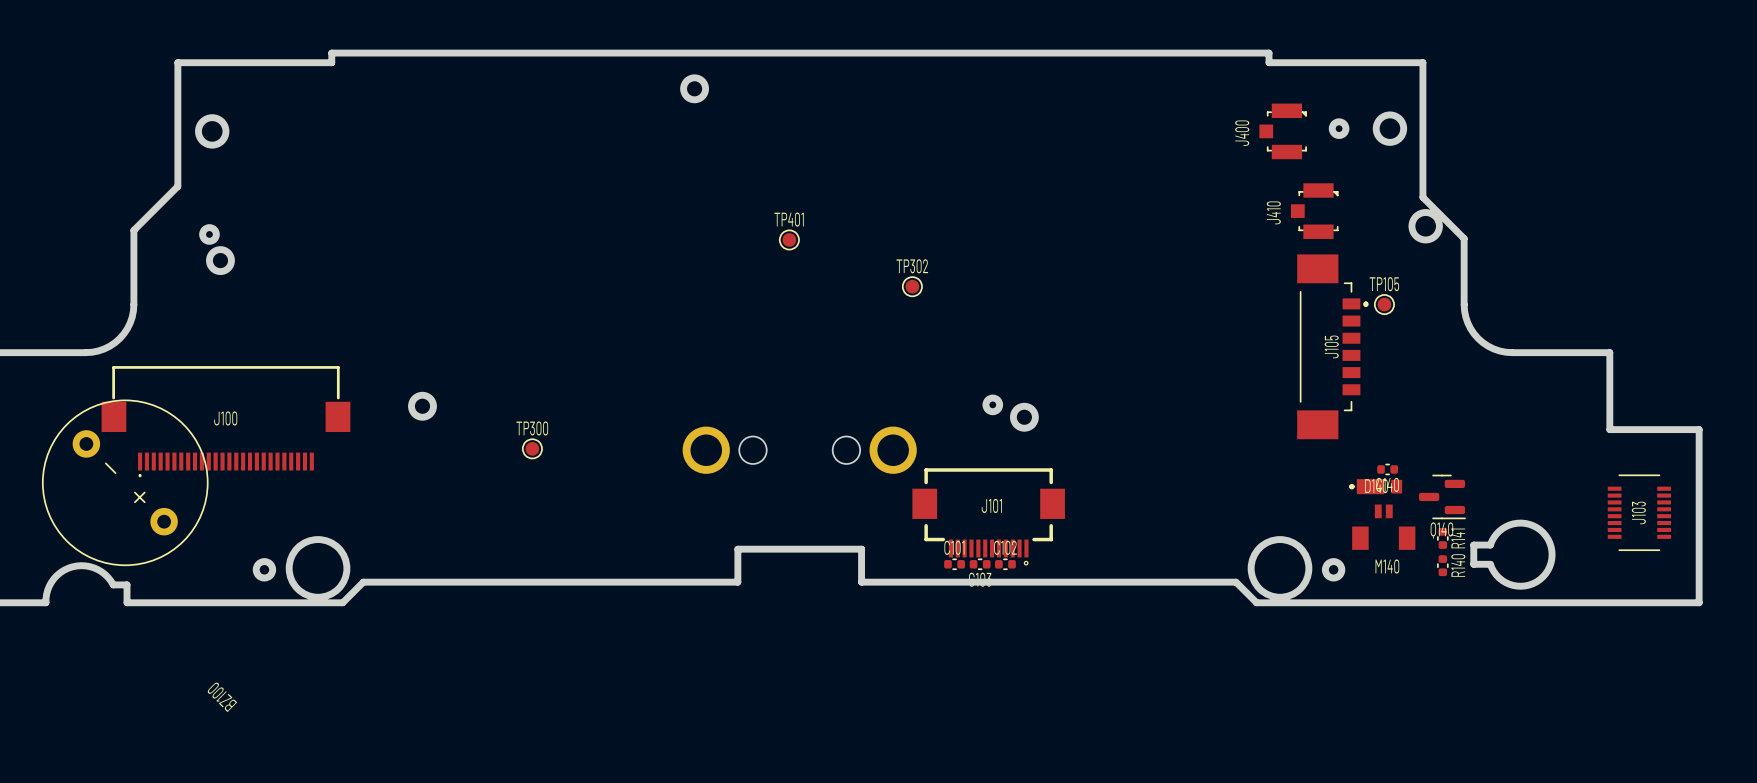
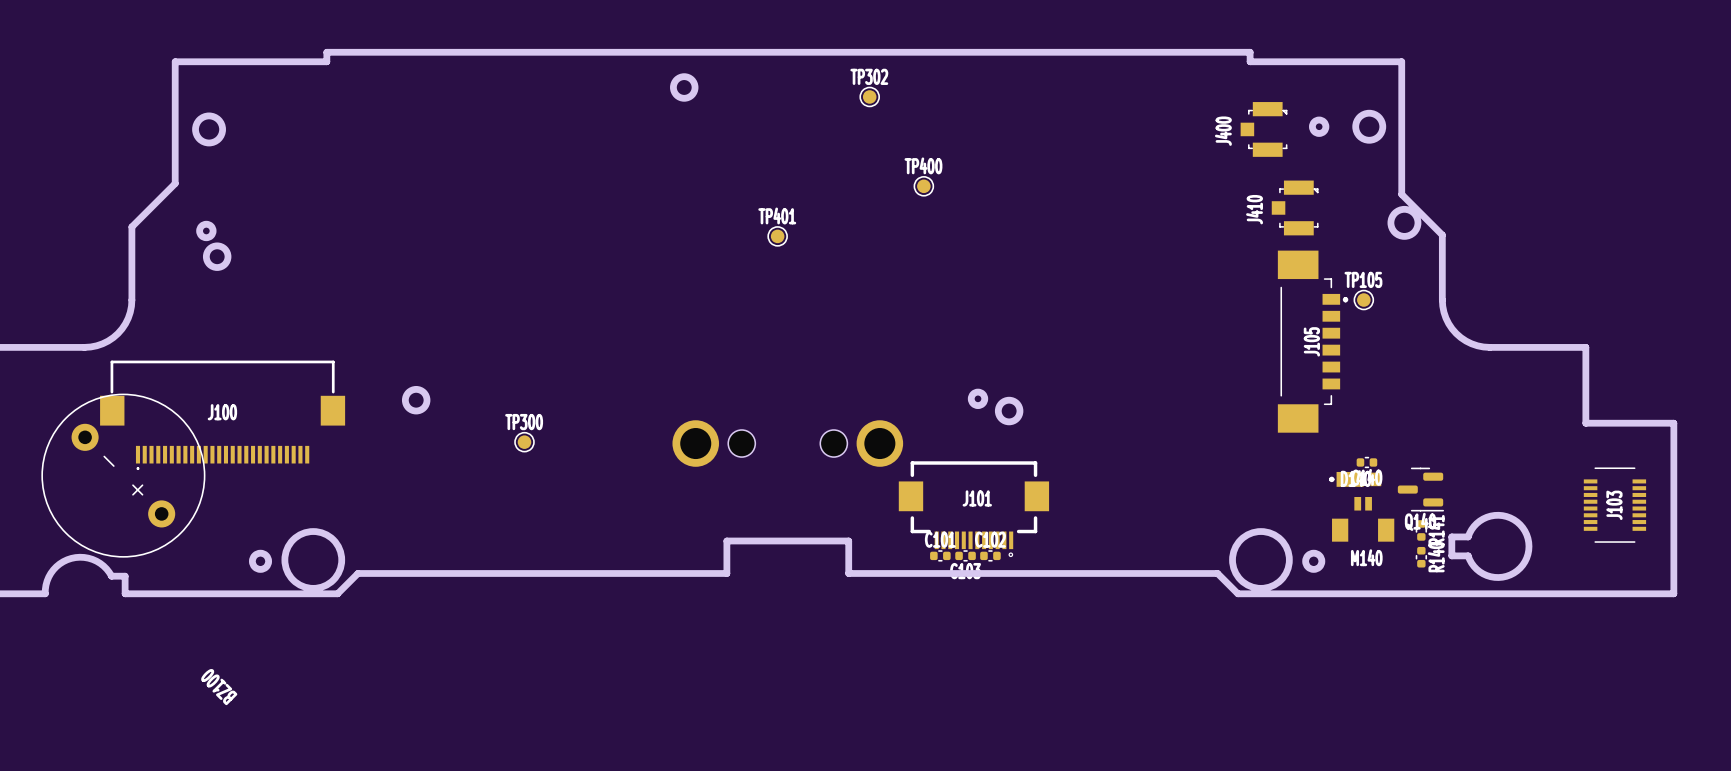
TP400: none -> (923, 186)
TP302 position: (912, 286) -> (869, 96)

